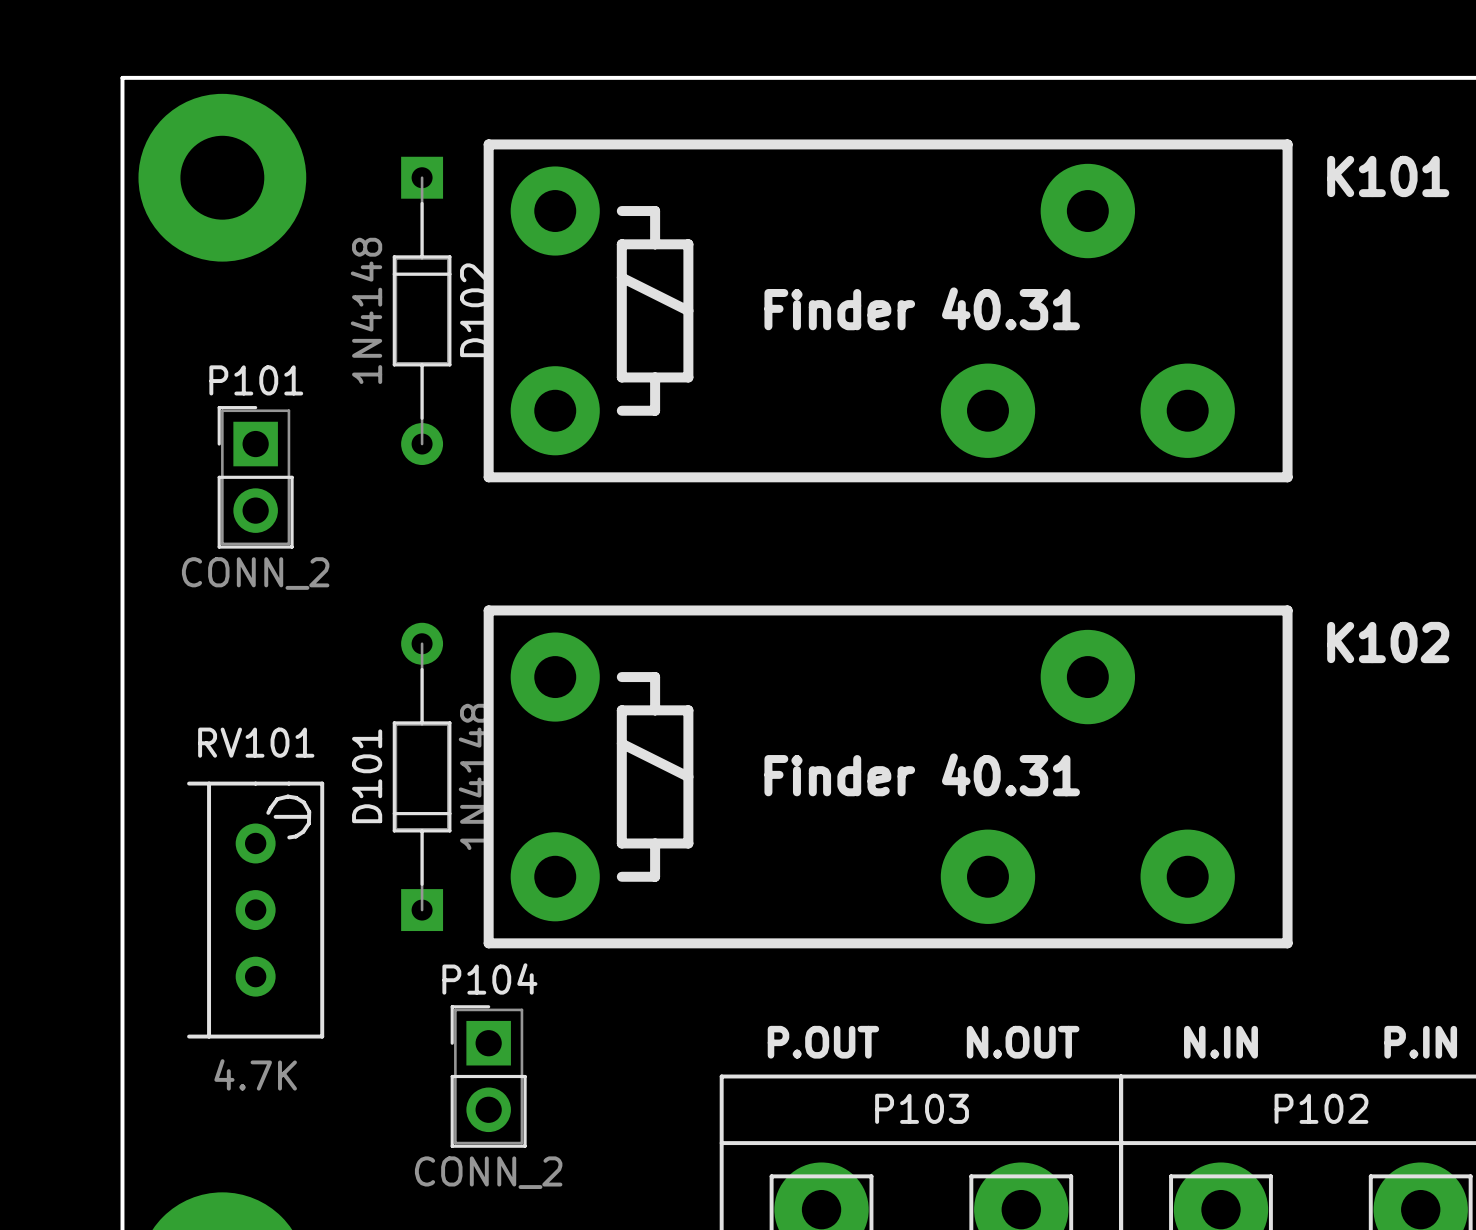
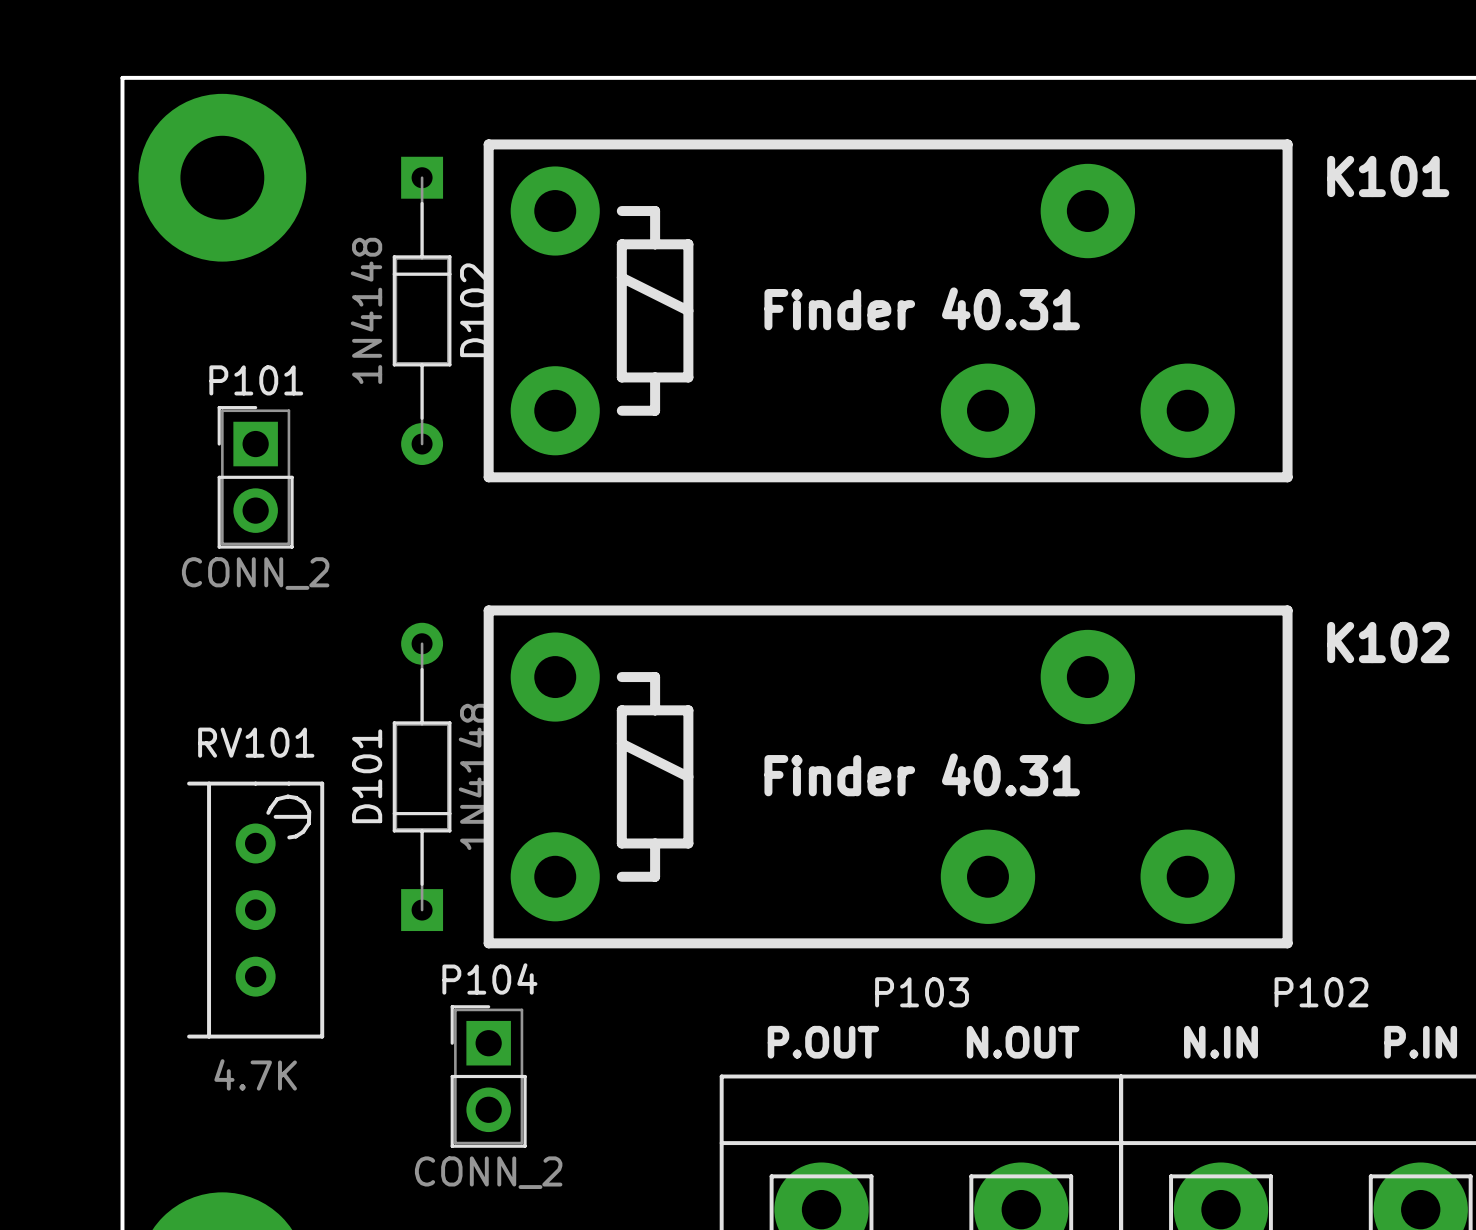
P103 name position: P103 (922, 1108) -> P103 (922, 992)
P102 name position: P102 (1321, 1108) -> P102 (1321, 992)

